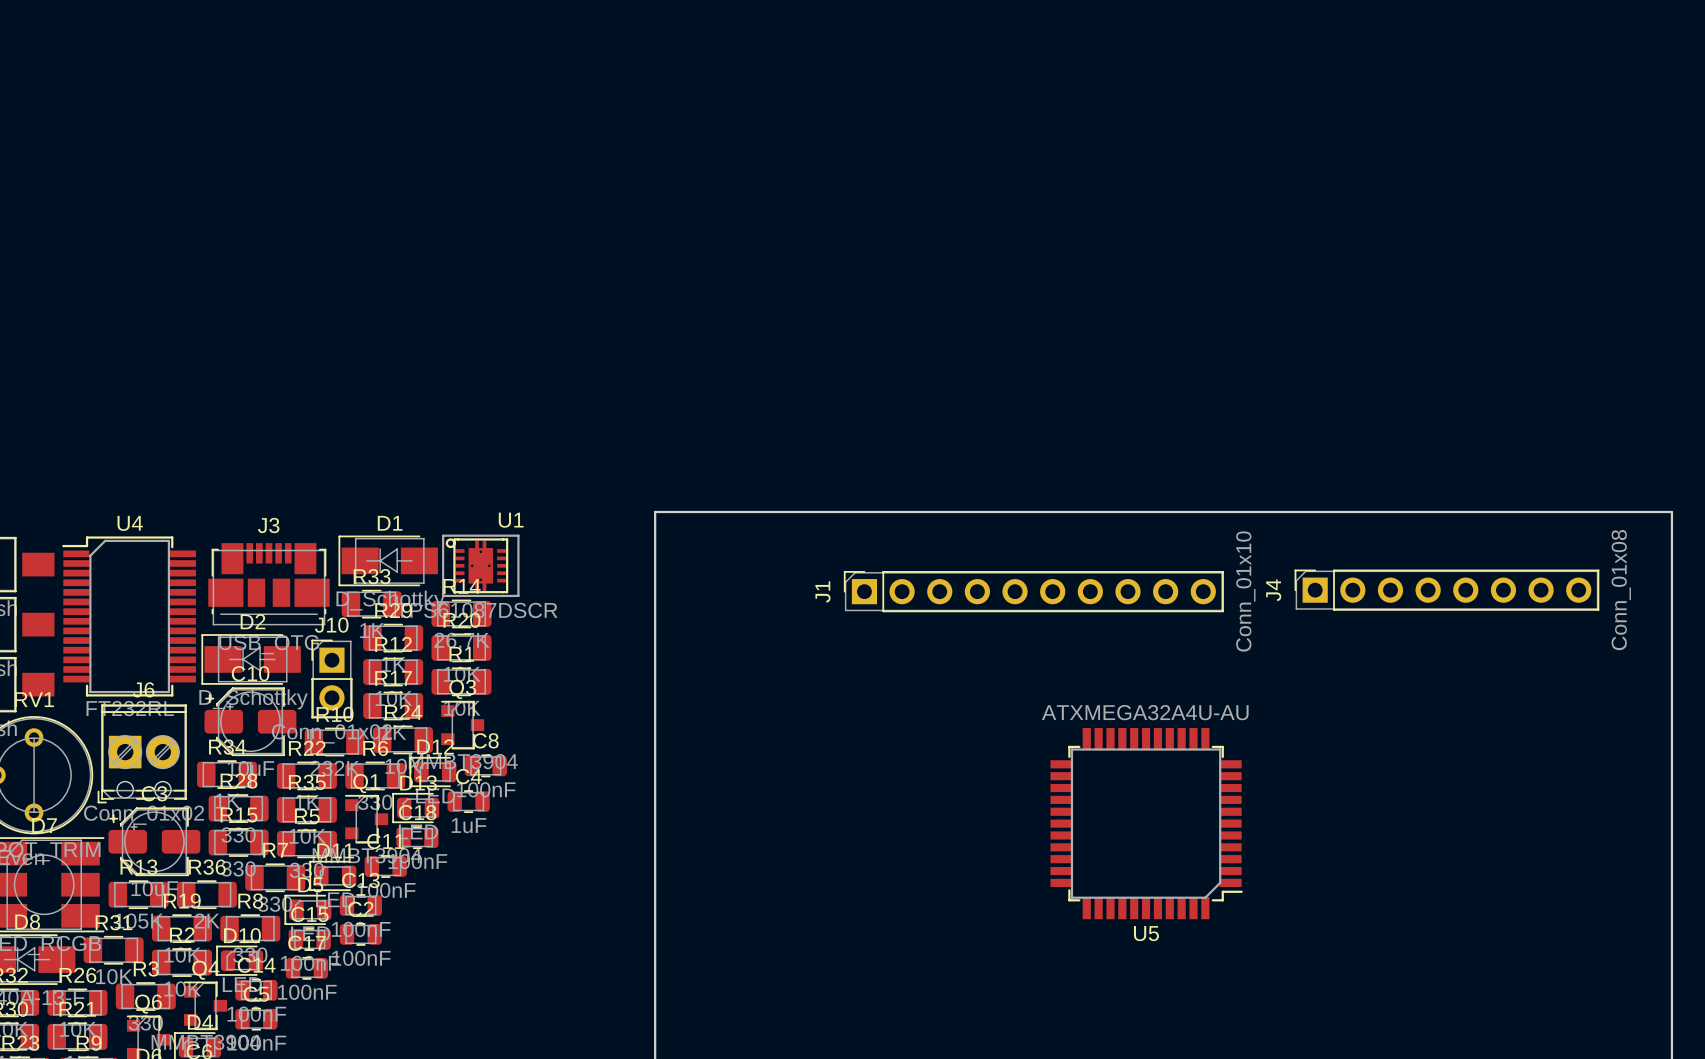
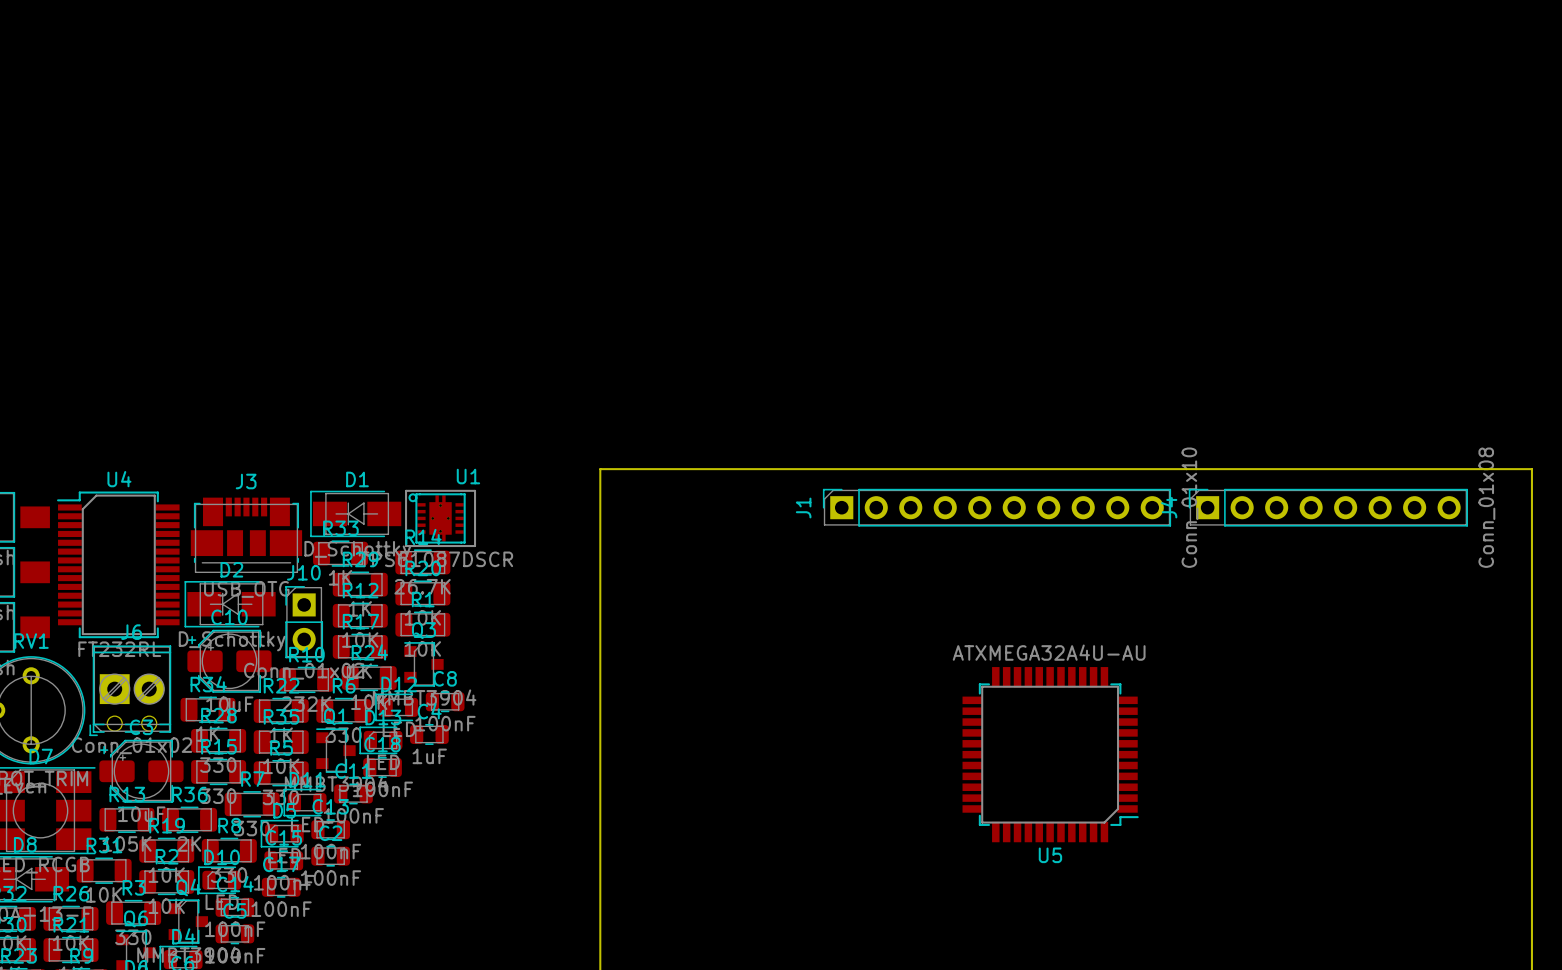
J4 position: (1446, 590) -> (1328, 507)
J1 position: (1033, 591) -> (997, 507)

